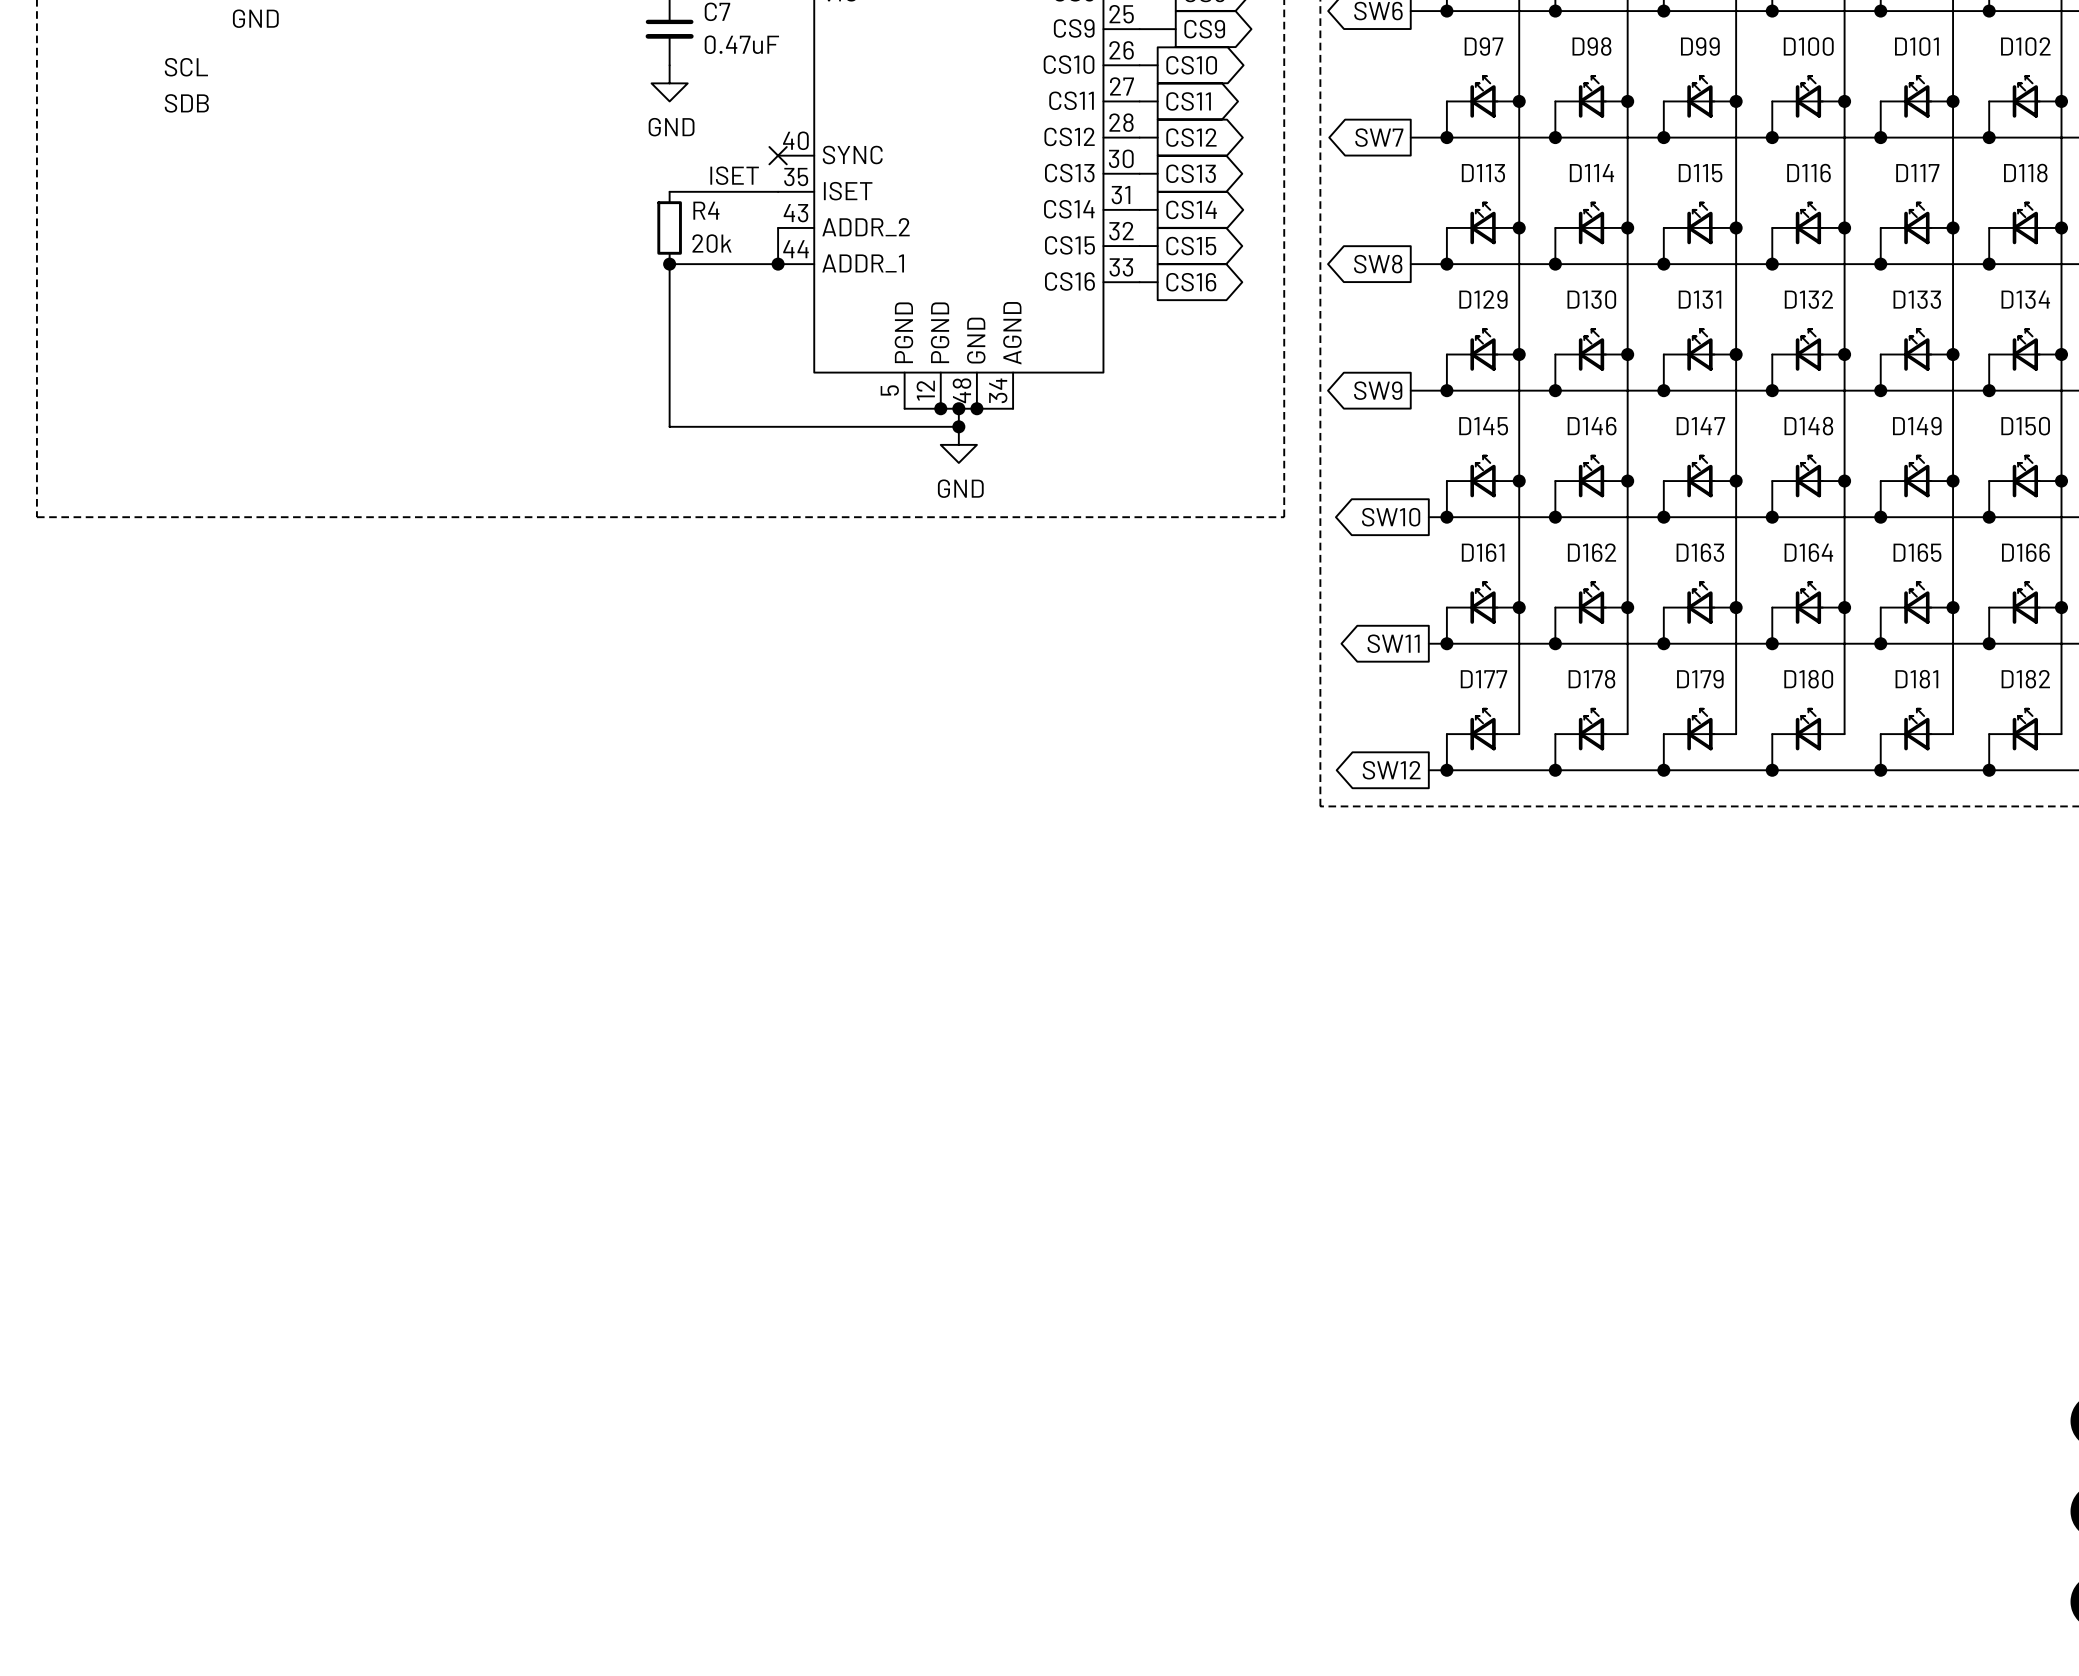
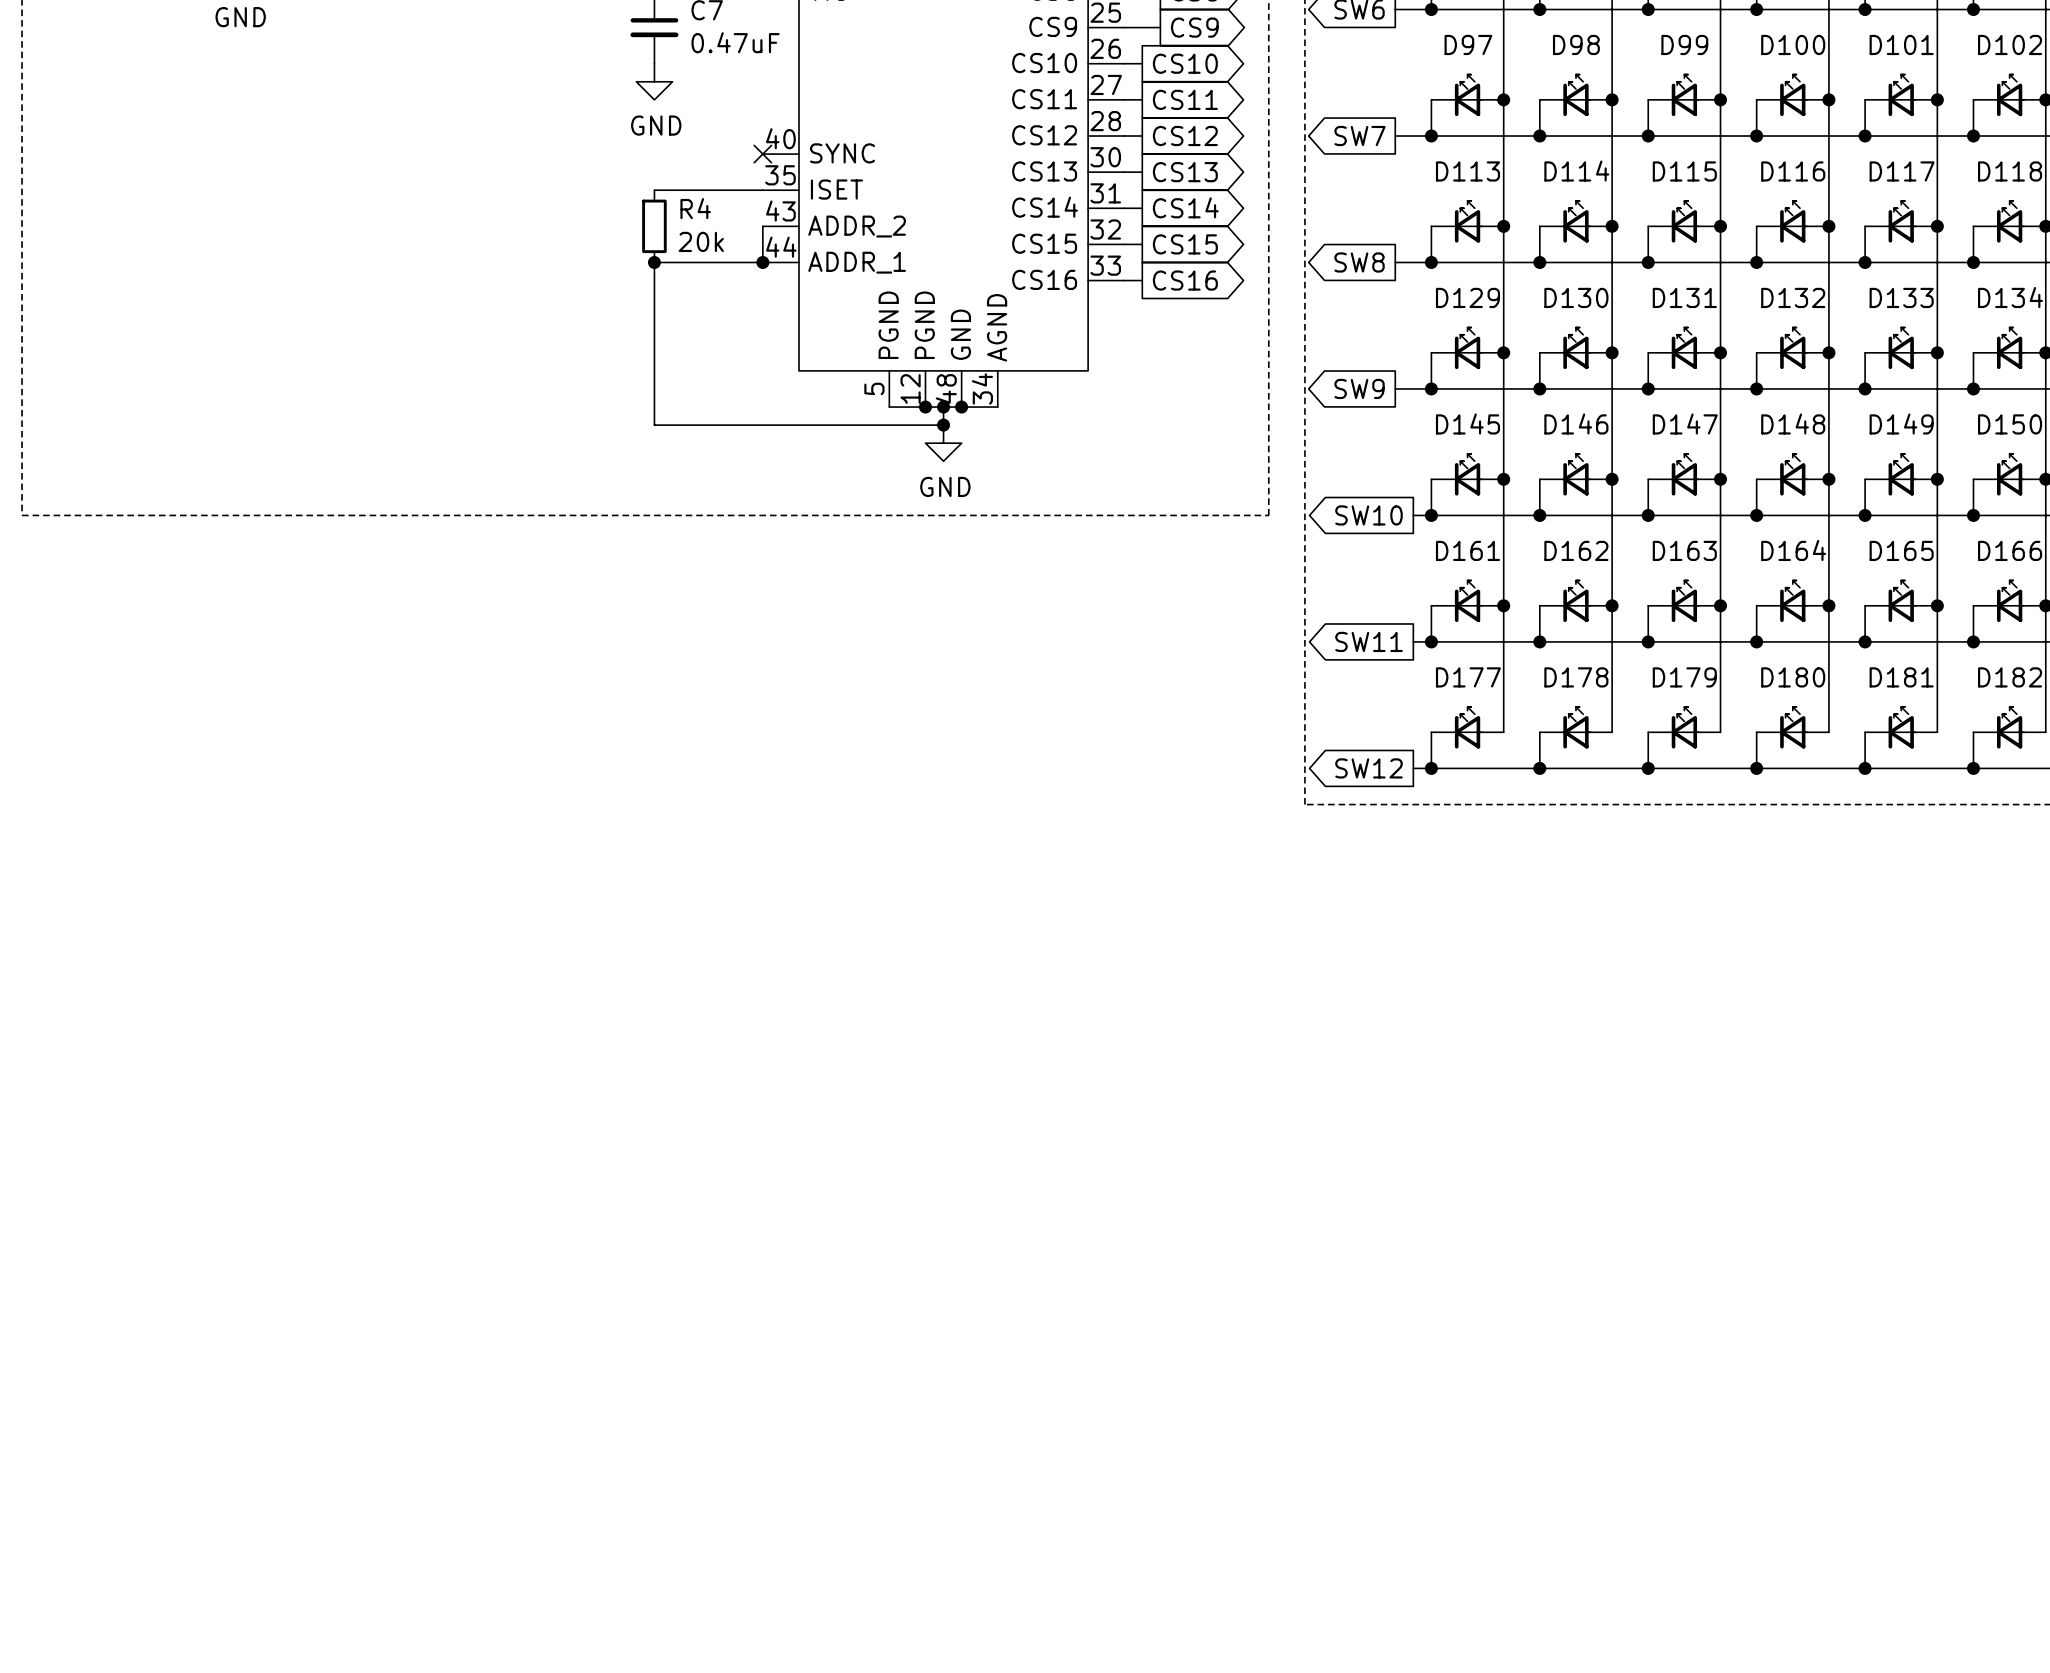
label: SCL (186, 67) -> none
label: SDB (186, 103) -> none
label: ISET (734, 175) -> none

